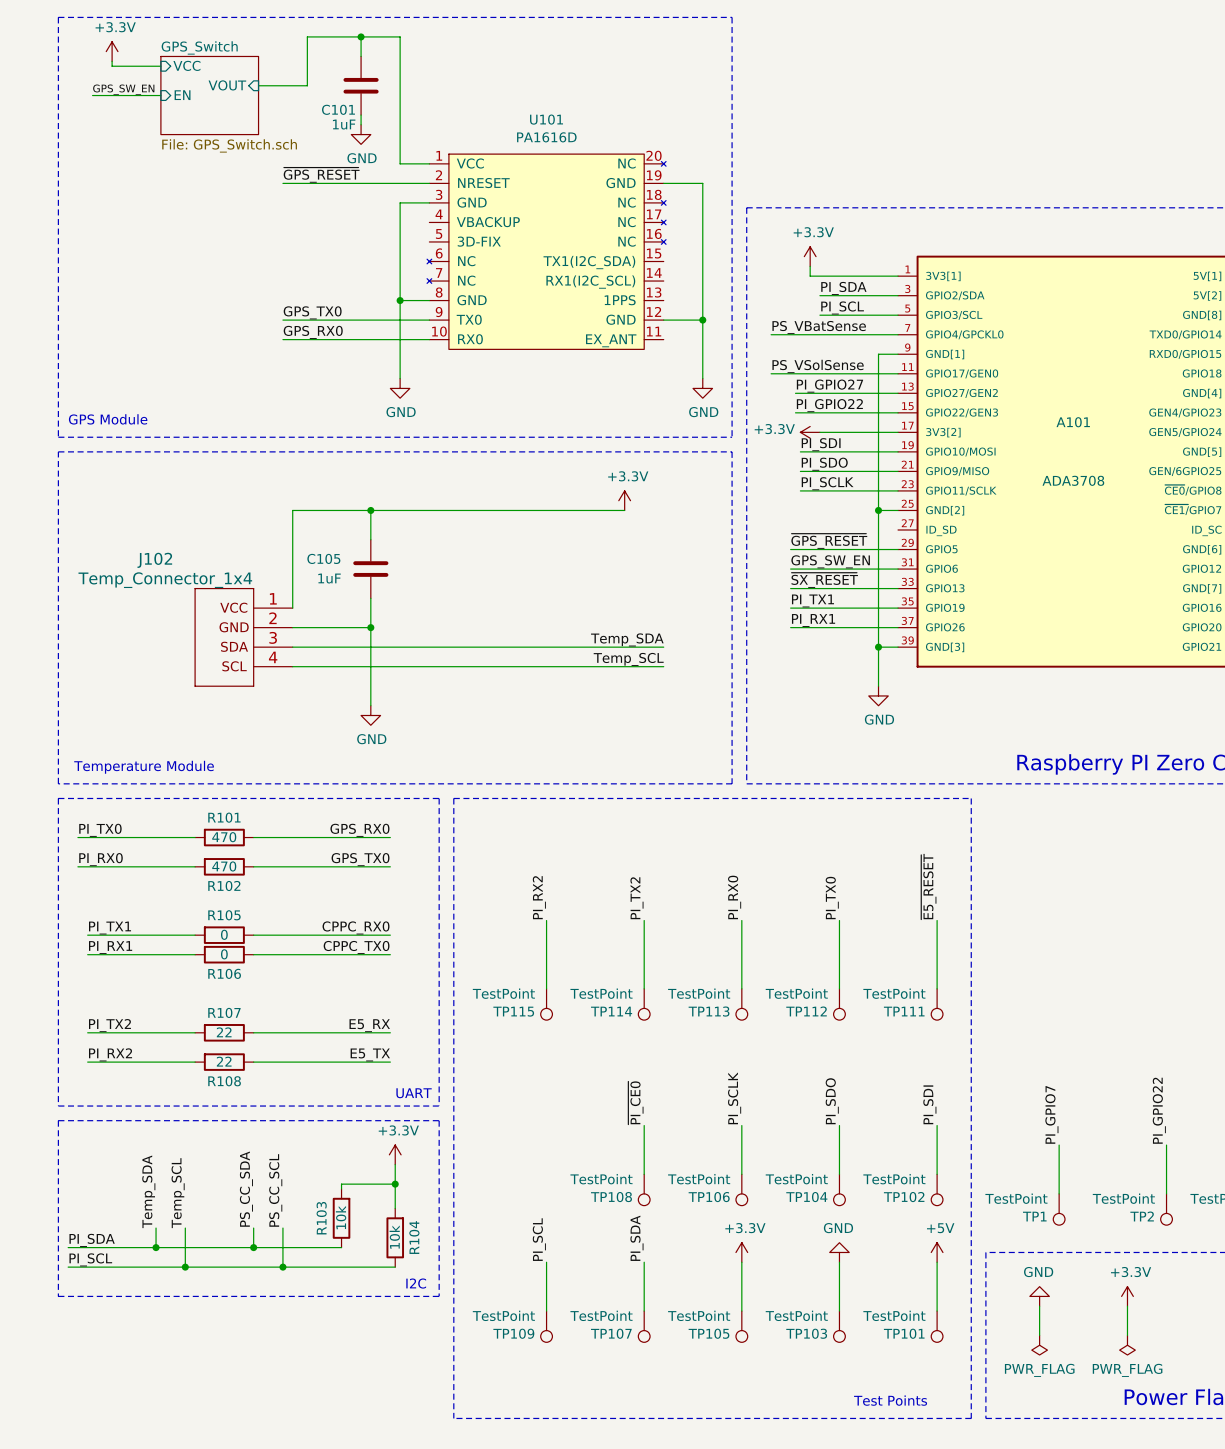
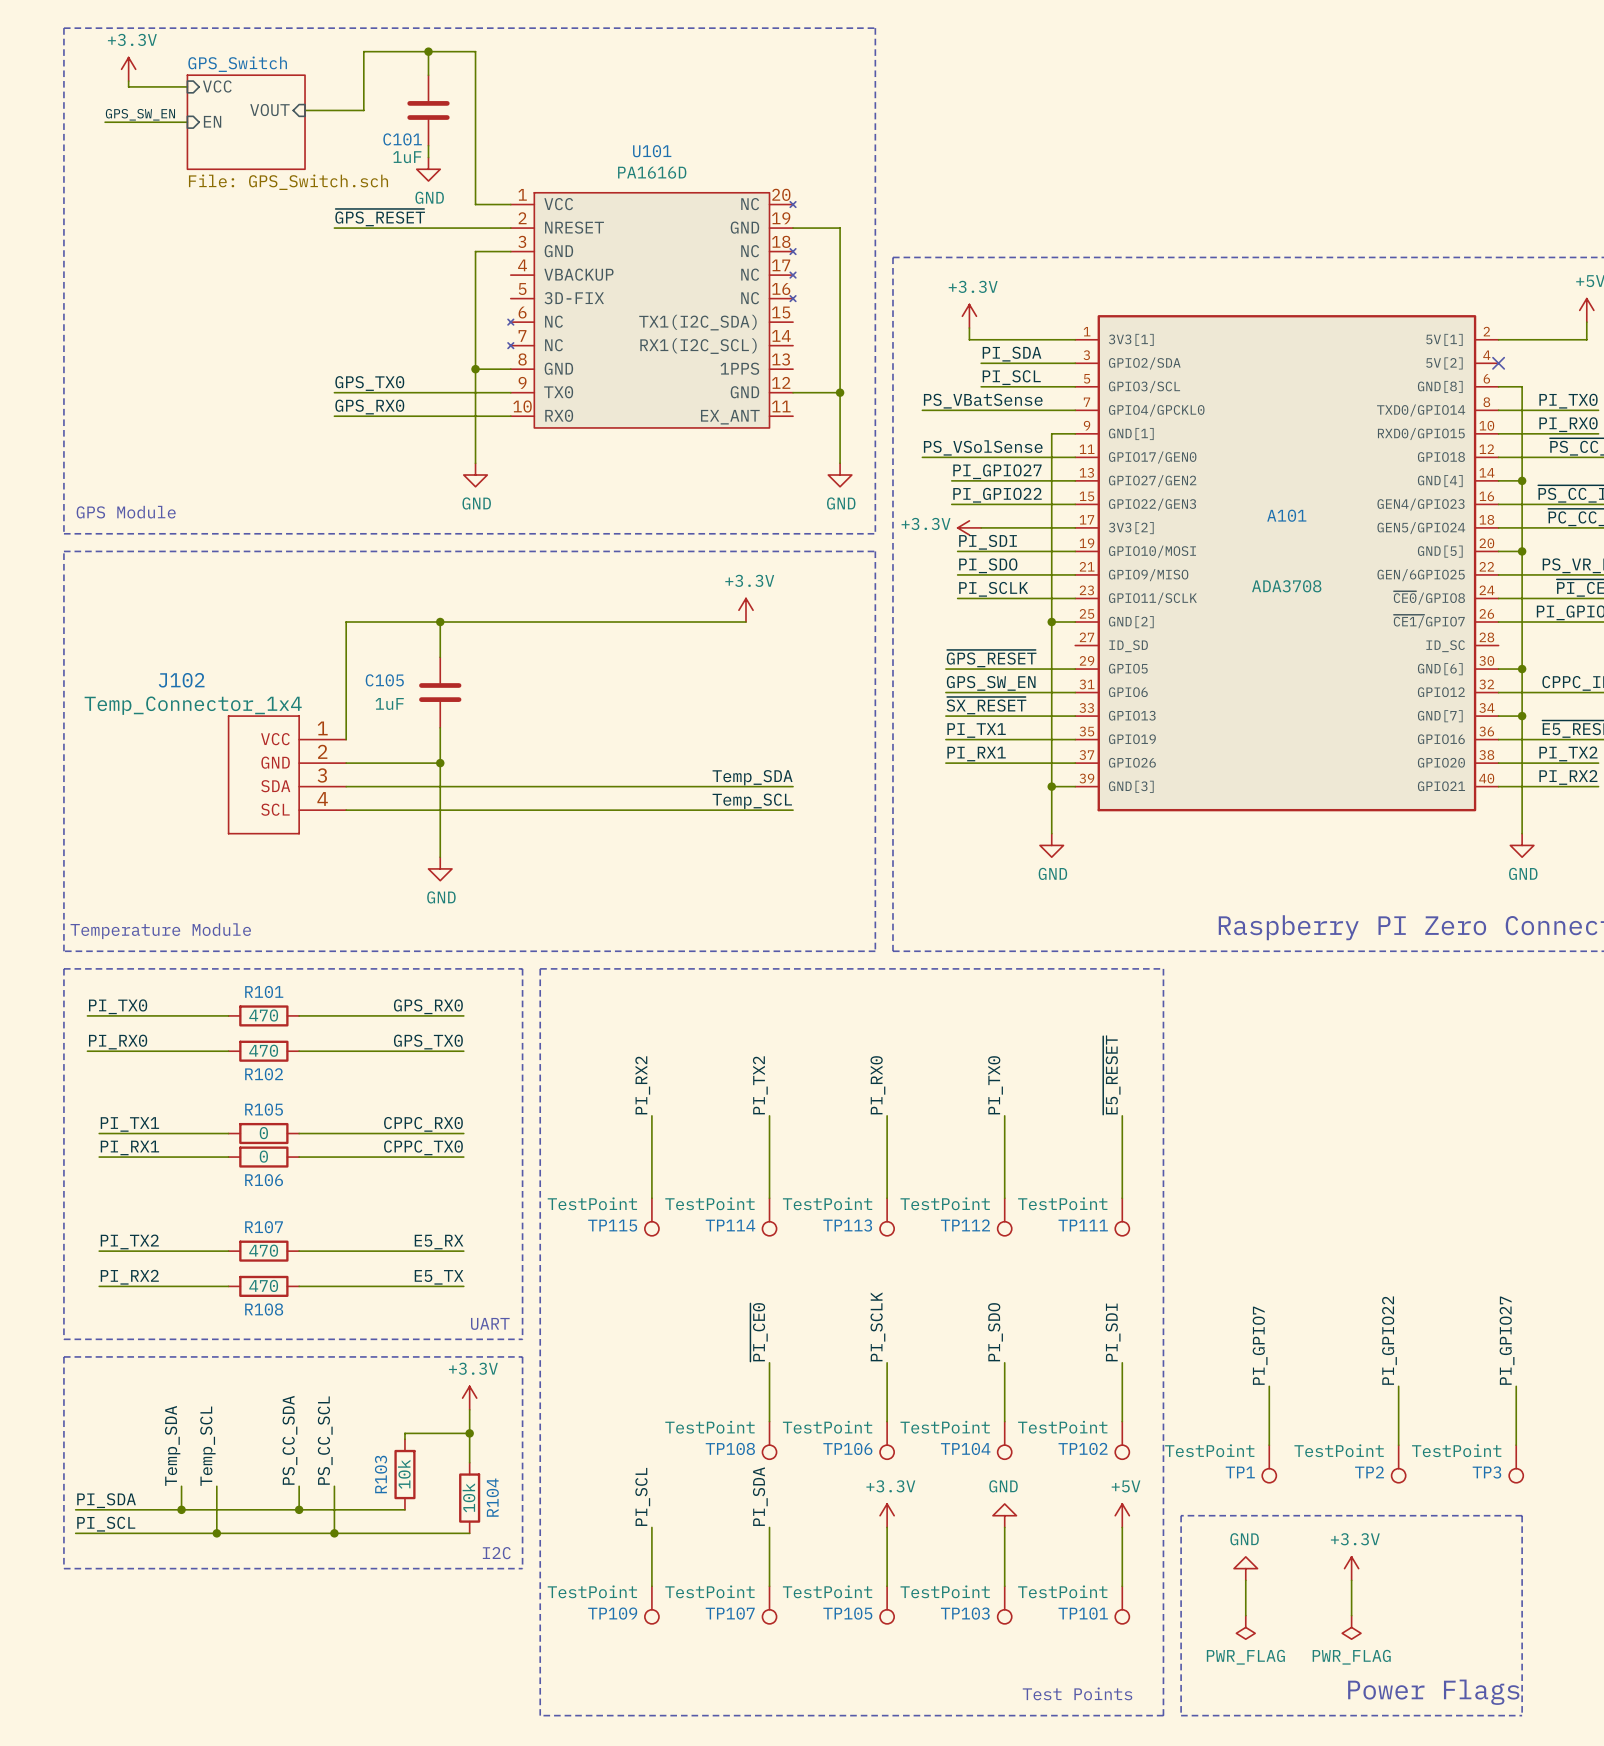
R107 value: 22 (224, 1032) -> 470 (263, 1250)
R108 value: 22 (224, 1061) -> 470 (263, 1285)

